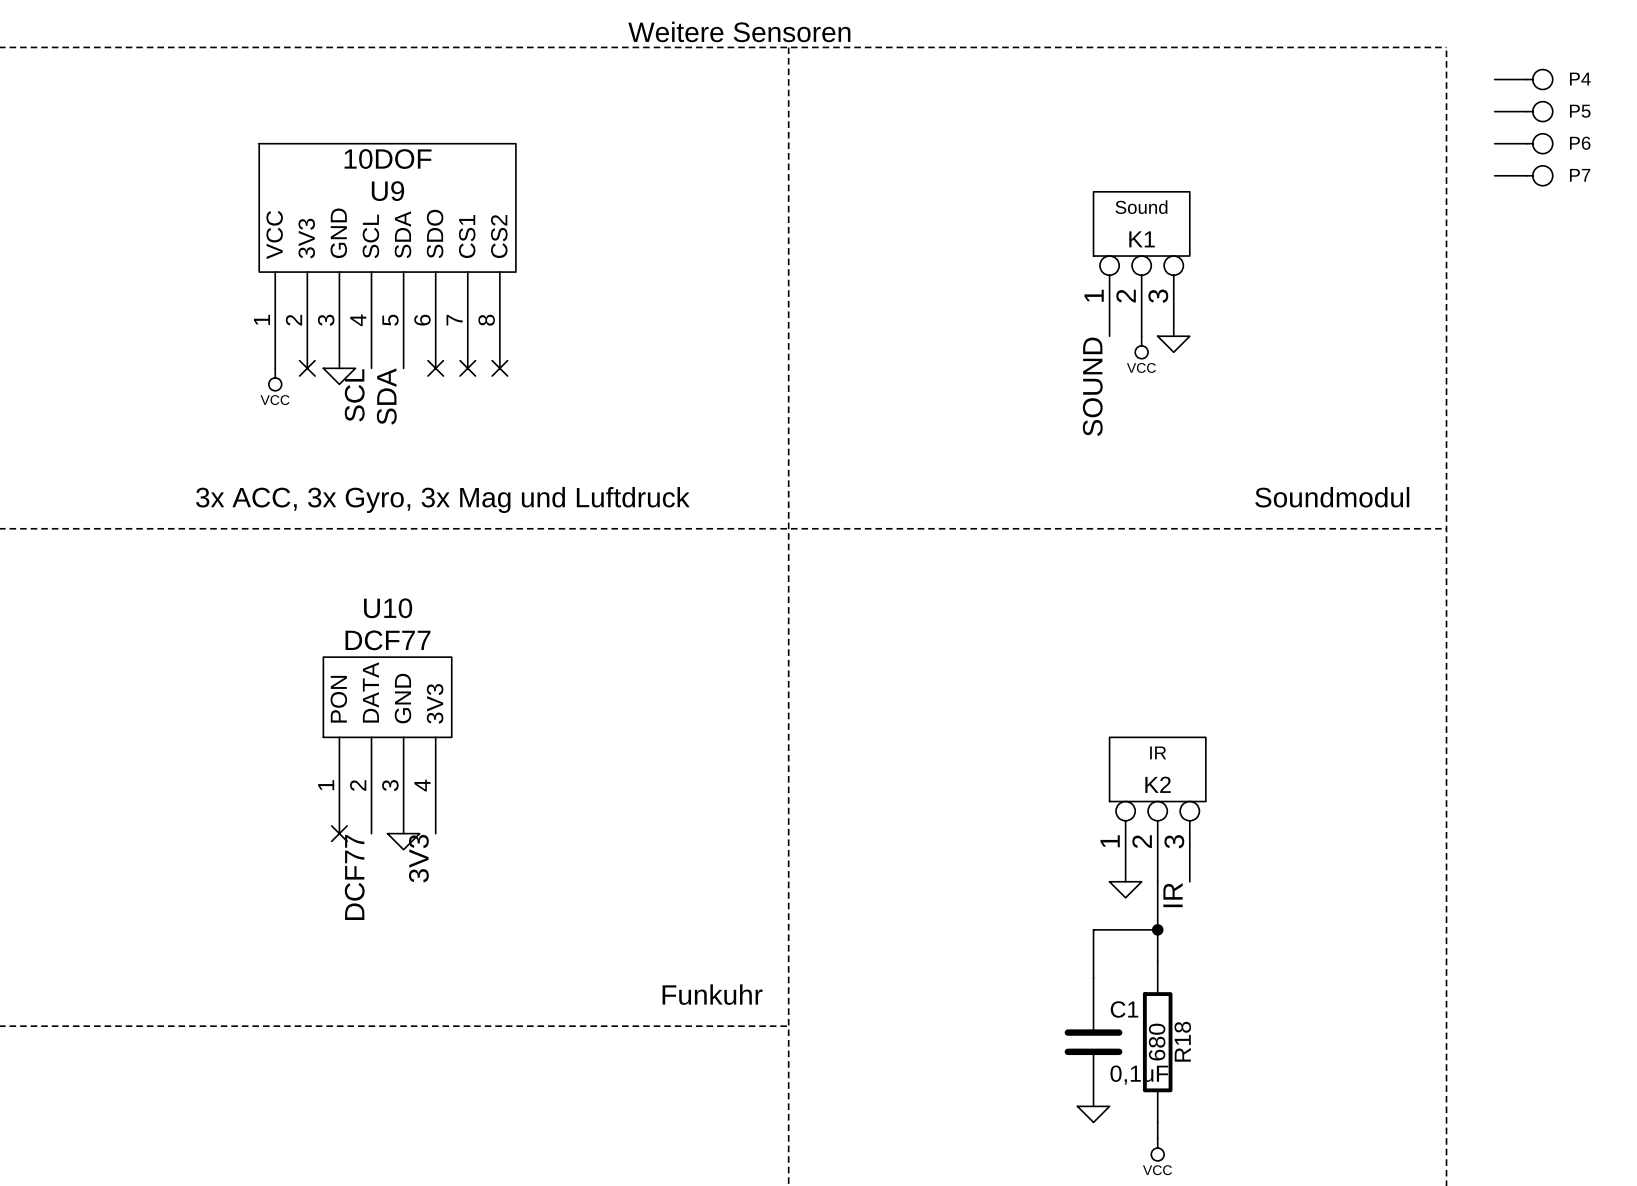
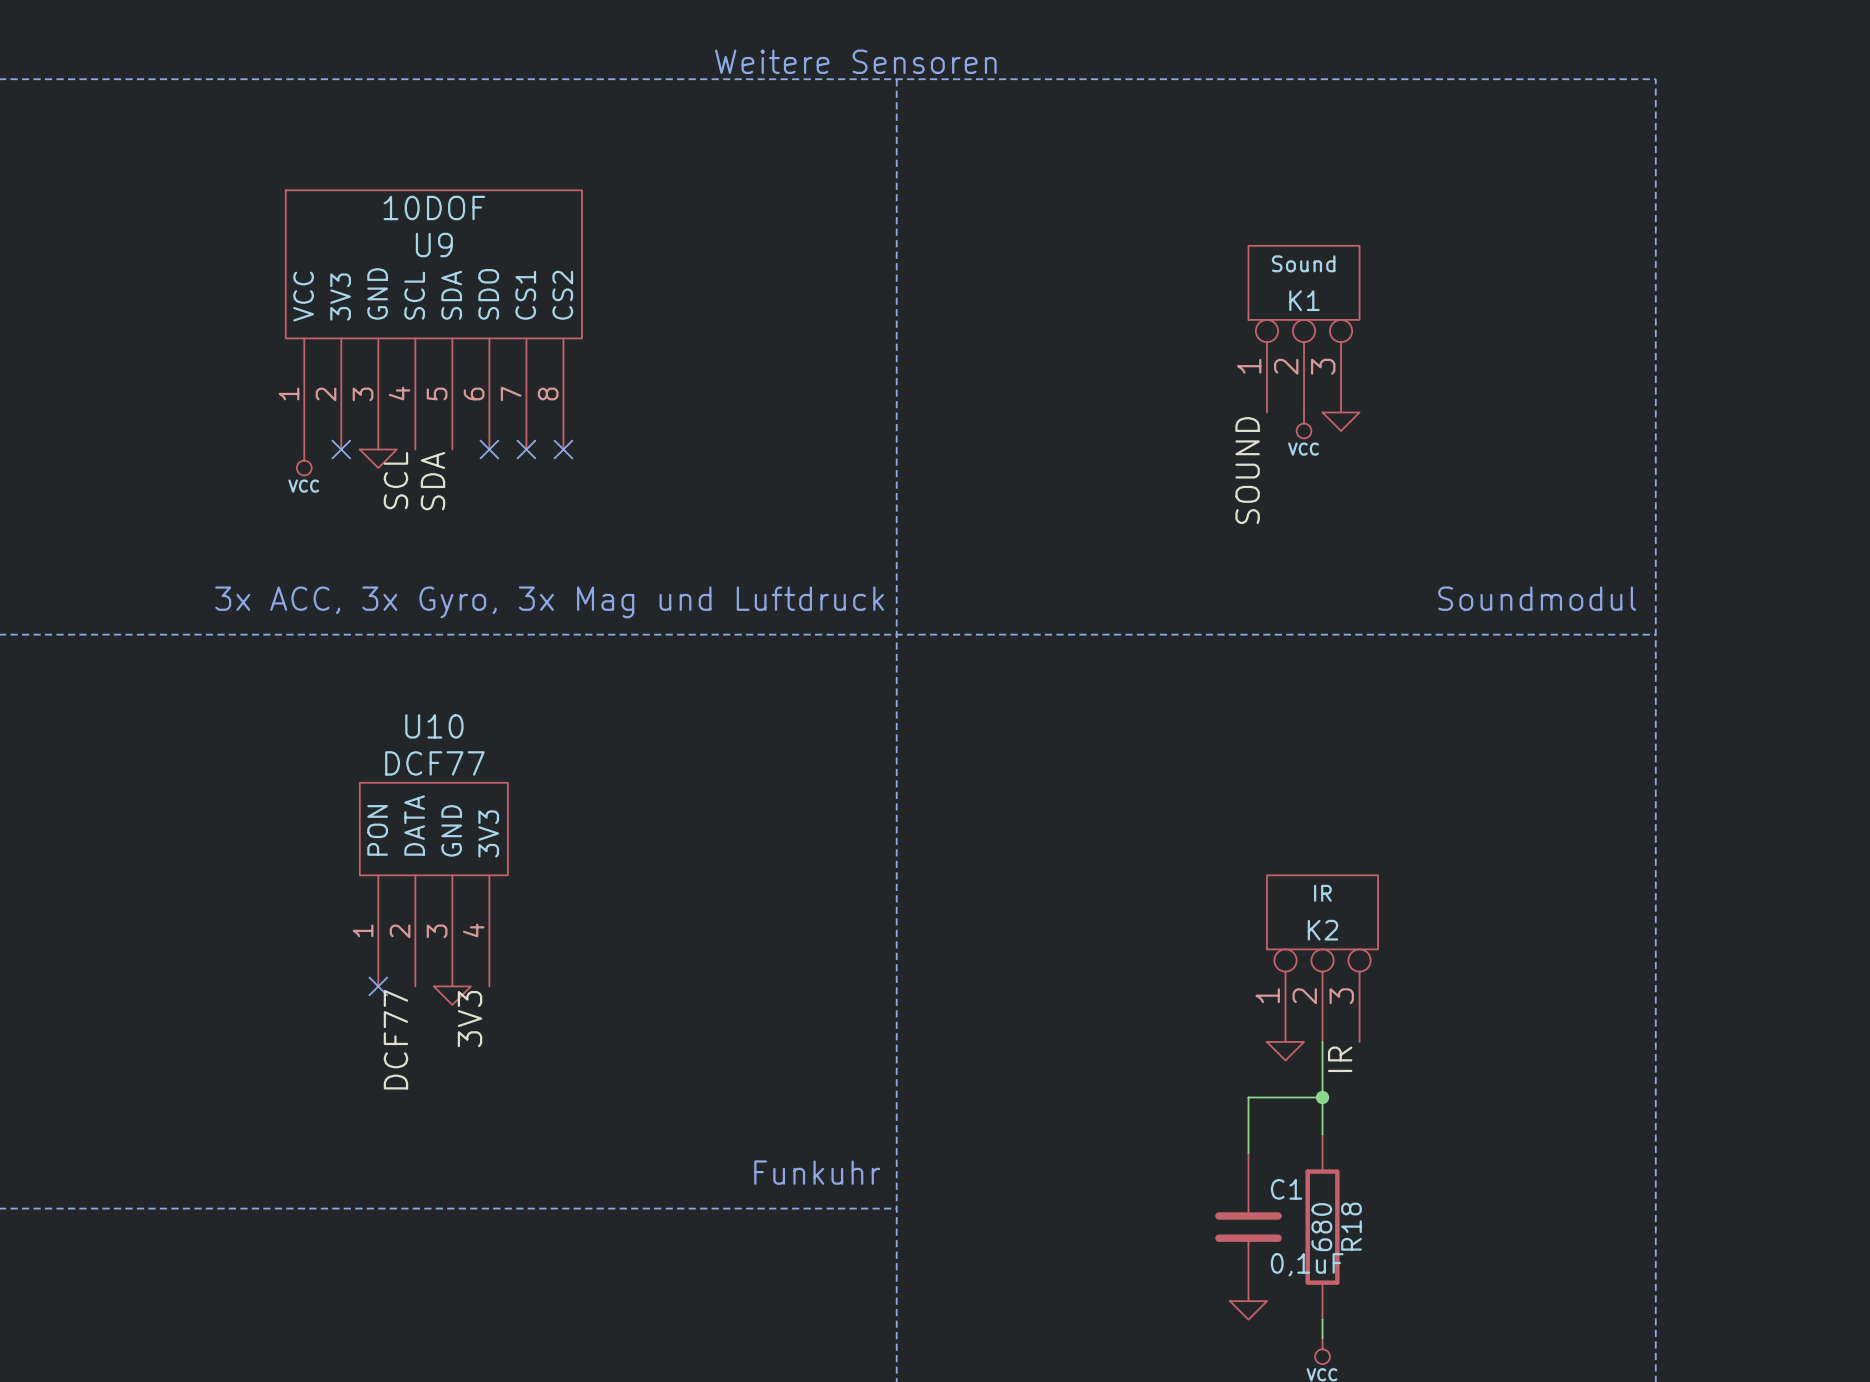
P4: (1523, 79) -> none
P5: (1523, 111) -> none
P6: (1523, 143) -> none
P7: (1523, 175) -> none

